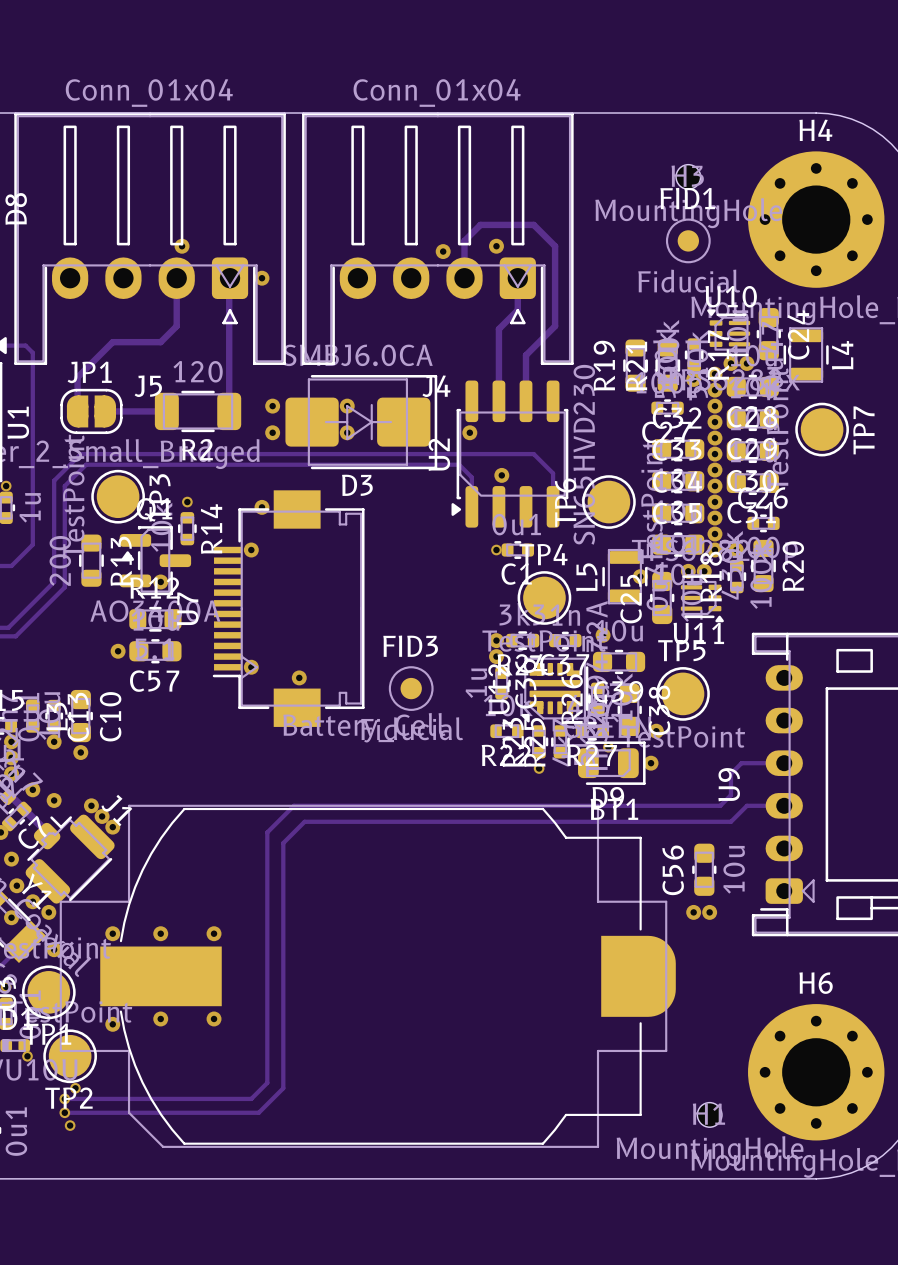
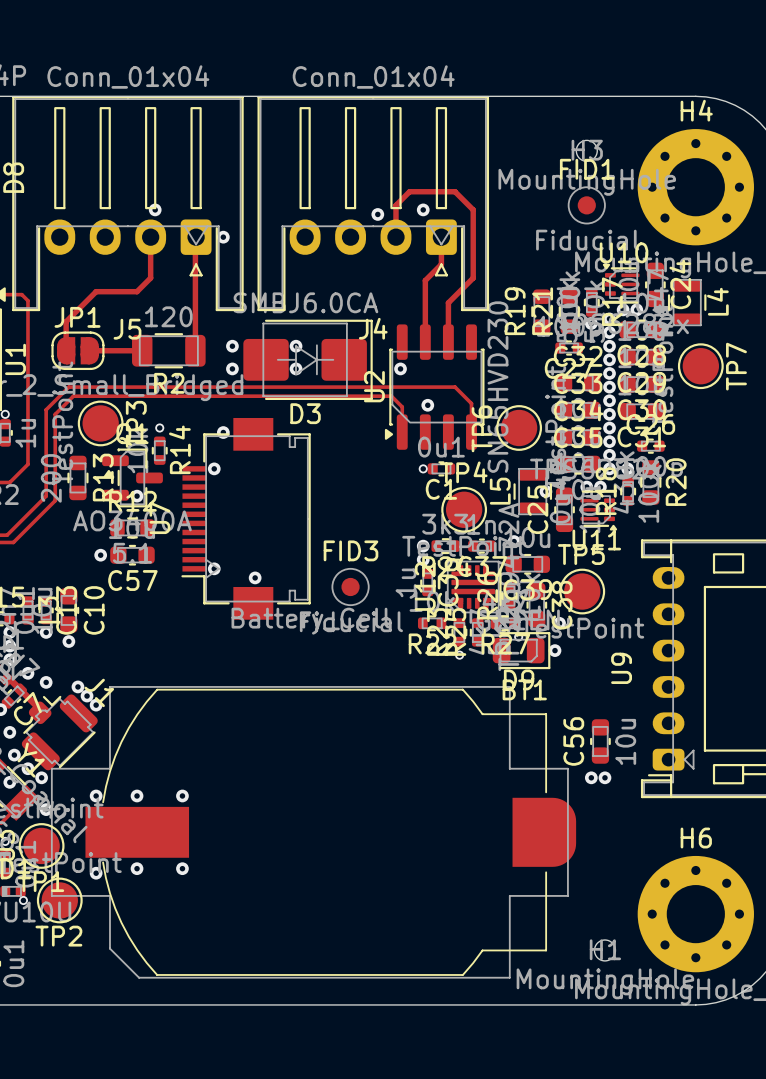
track: (784, 763) (741, 763) (730, 773) (730, 795) (720, 805) (293, 805) (267, 832) (267, 1082) (251, 1098) (64, 1098) -> none
track: (784, 805) (746, 805) (730, 821) (304, 821) (283, 843) (283, 1088) (258, 1112) (64, 1112) -> none
via: (75, 1088) -> none
via: (64, 1098) -> none
via: (64, 1112) -> none
via: (70, 1125) -> none

